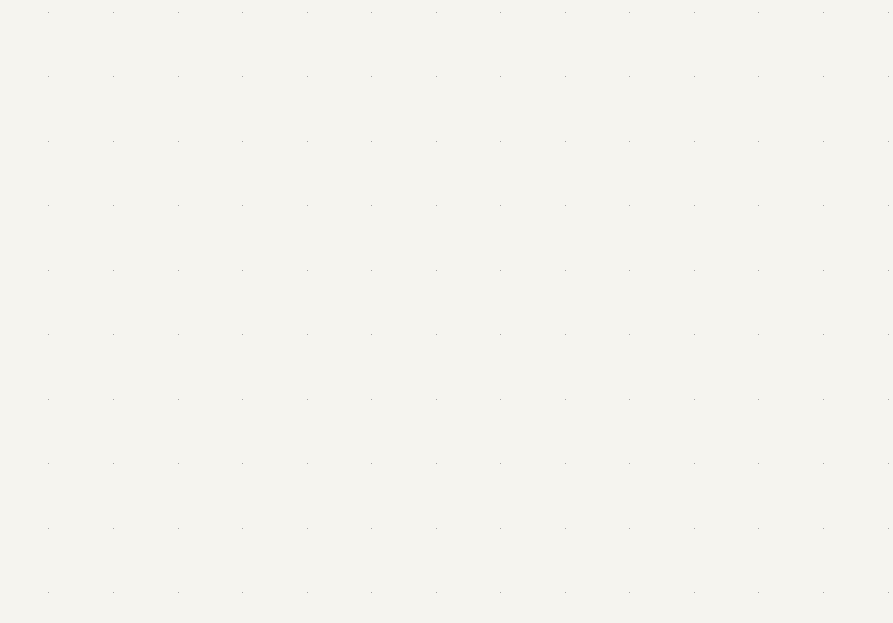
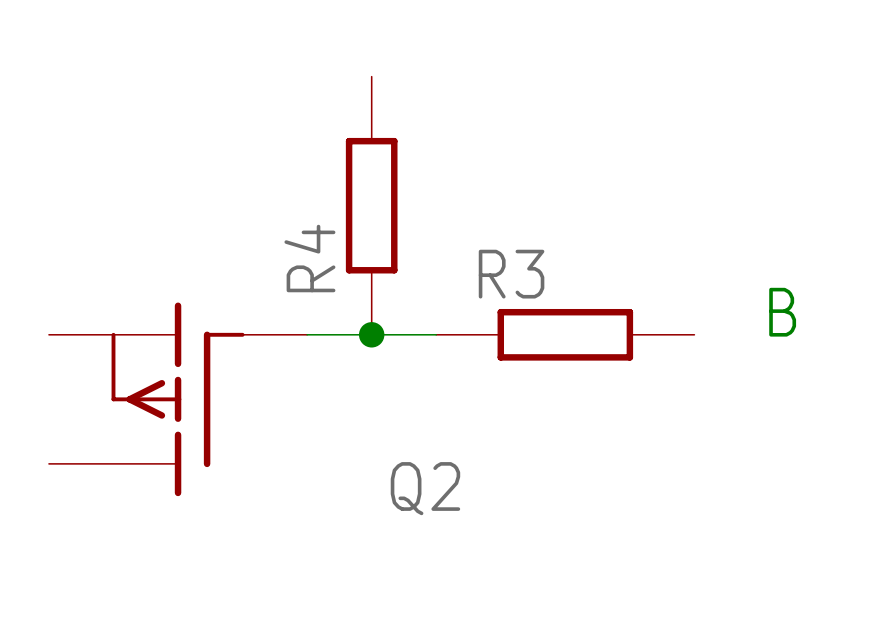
R4: none -> (371, 205)
text: none -> B (782, 312)
wire: none -> (307, 334) (436, 334)
junction: none -> (371, 334)
R3: none -> (565, 334)
Q2: none -> (178, 399)

